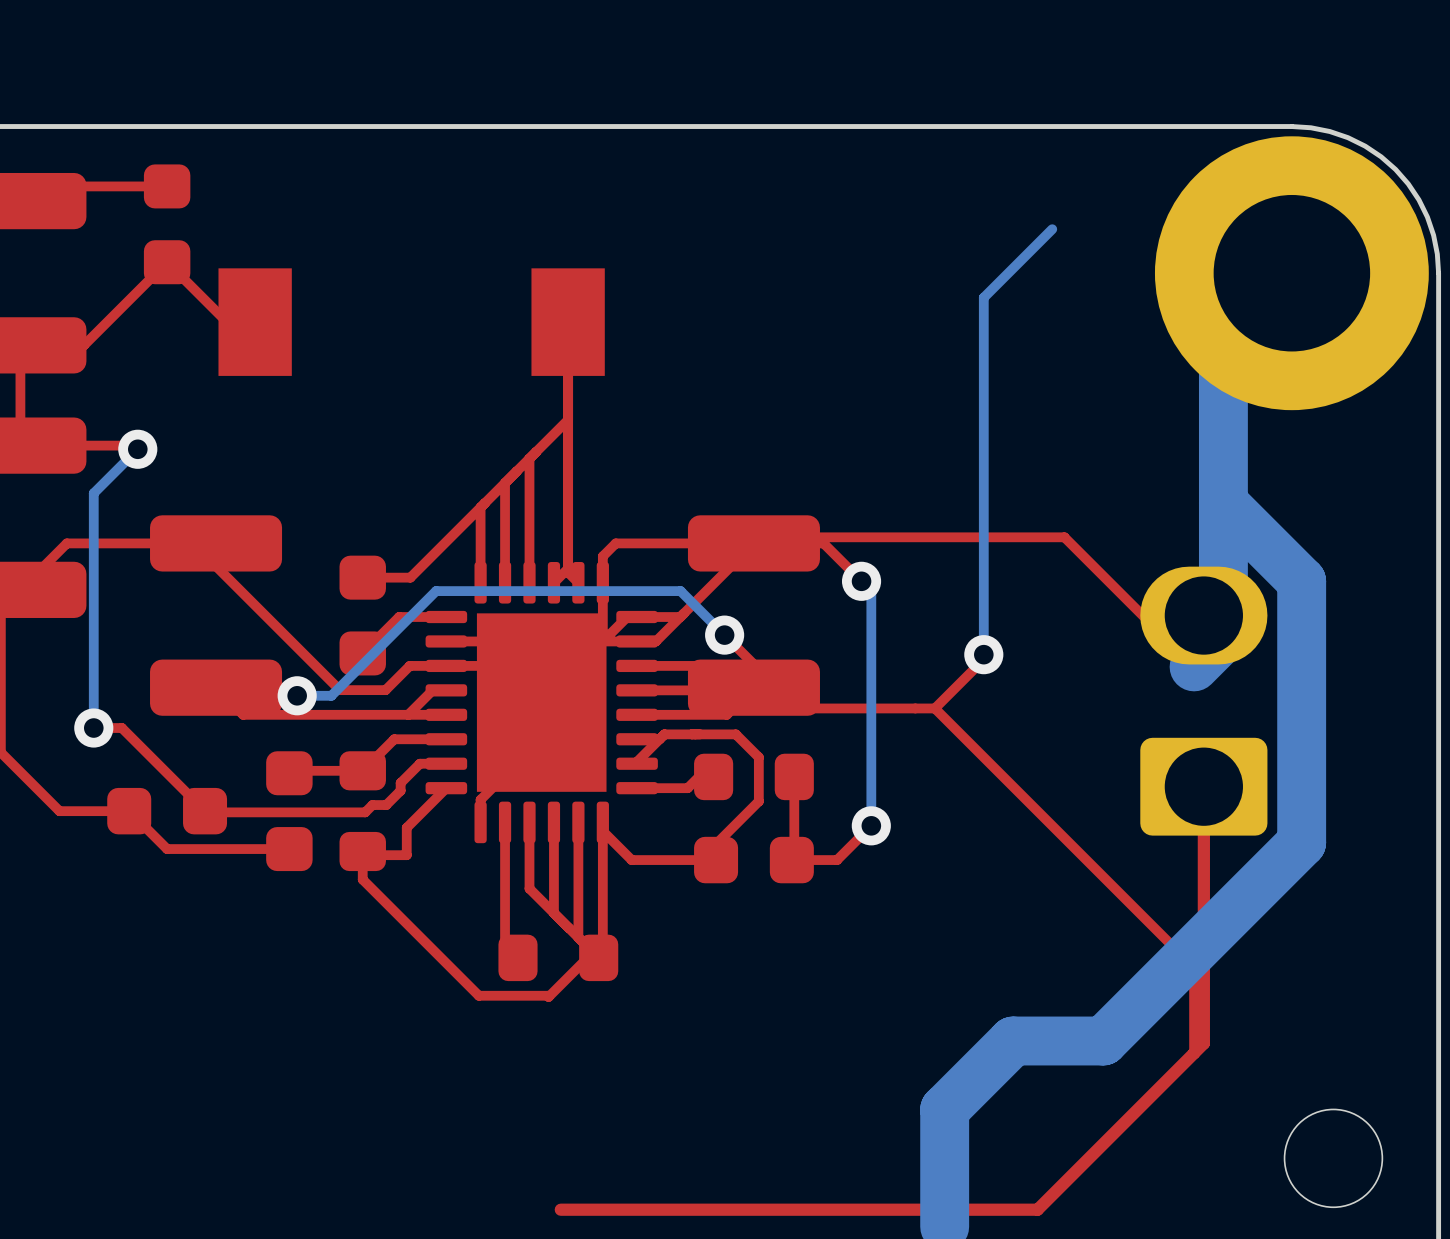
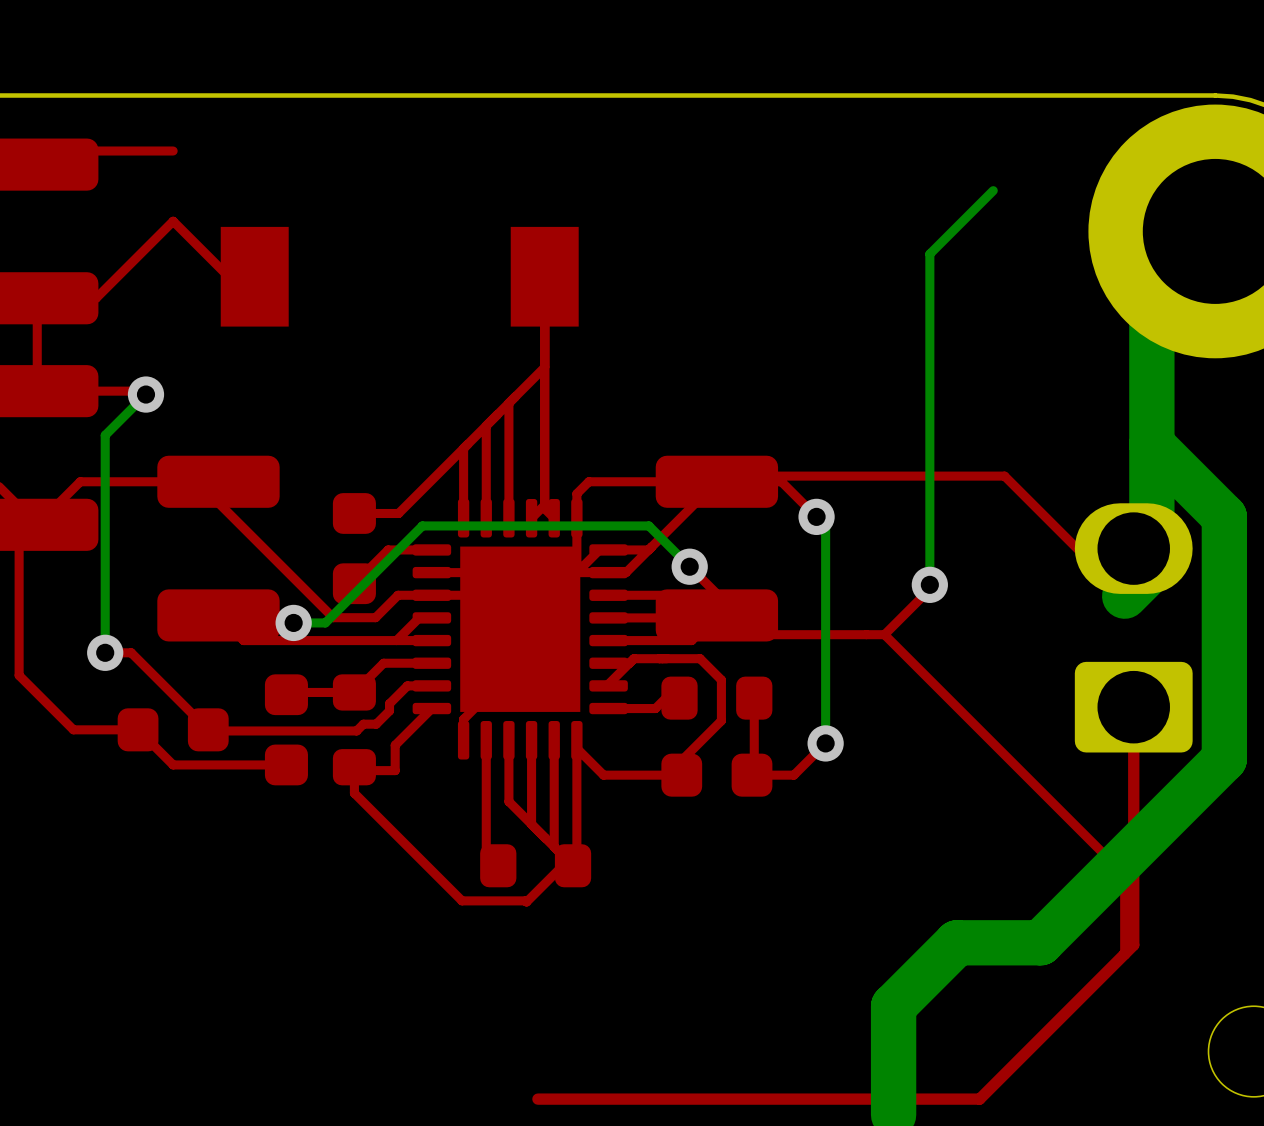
part: (167, 224) -> none

